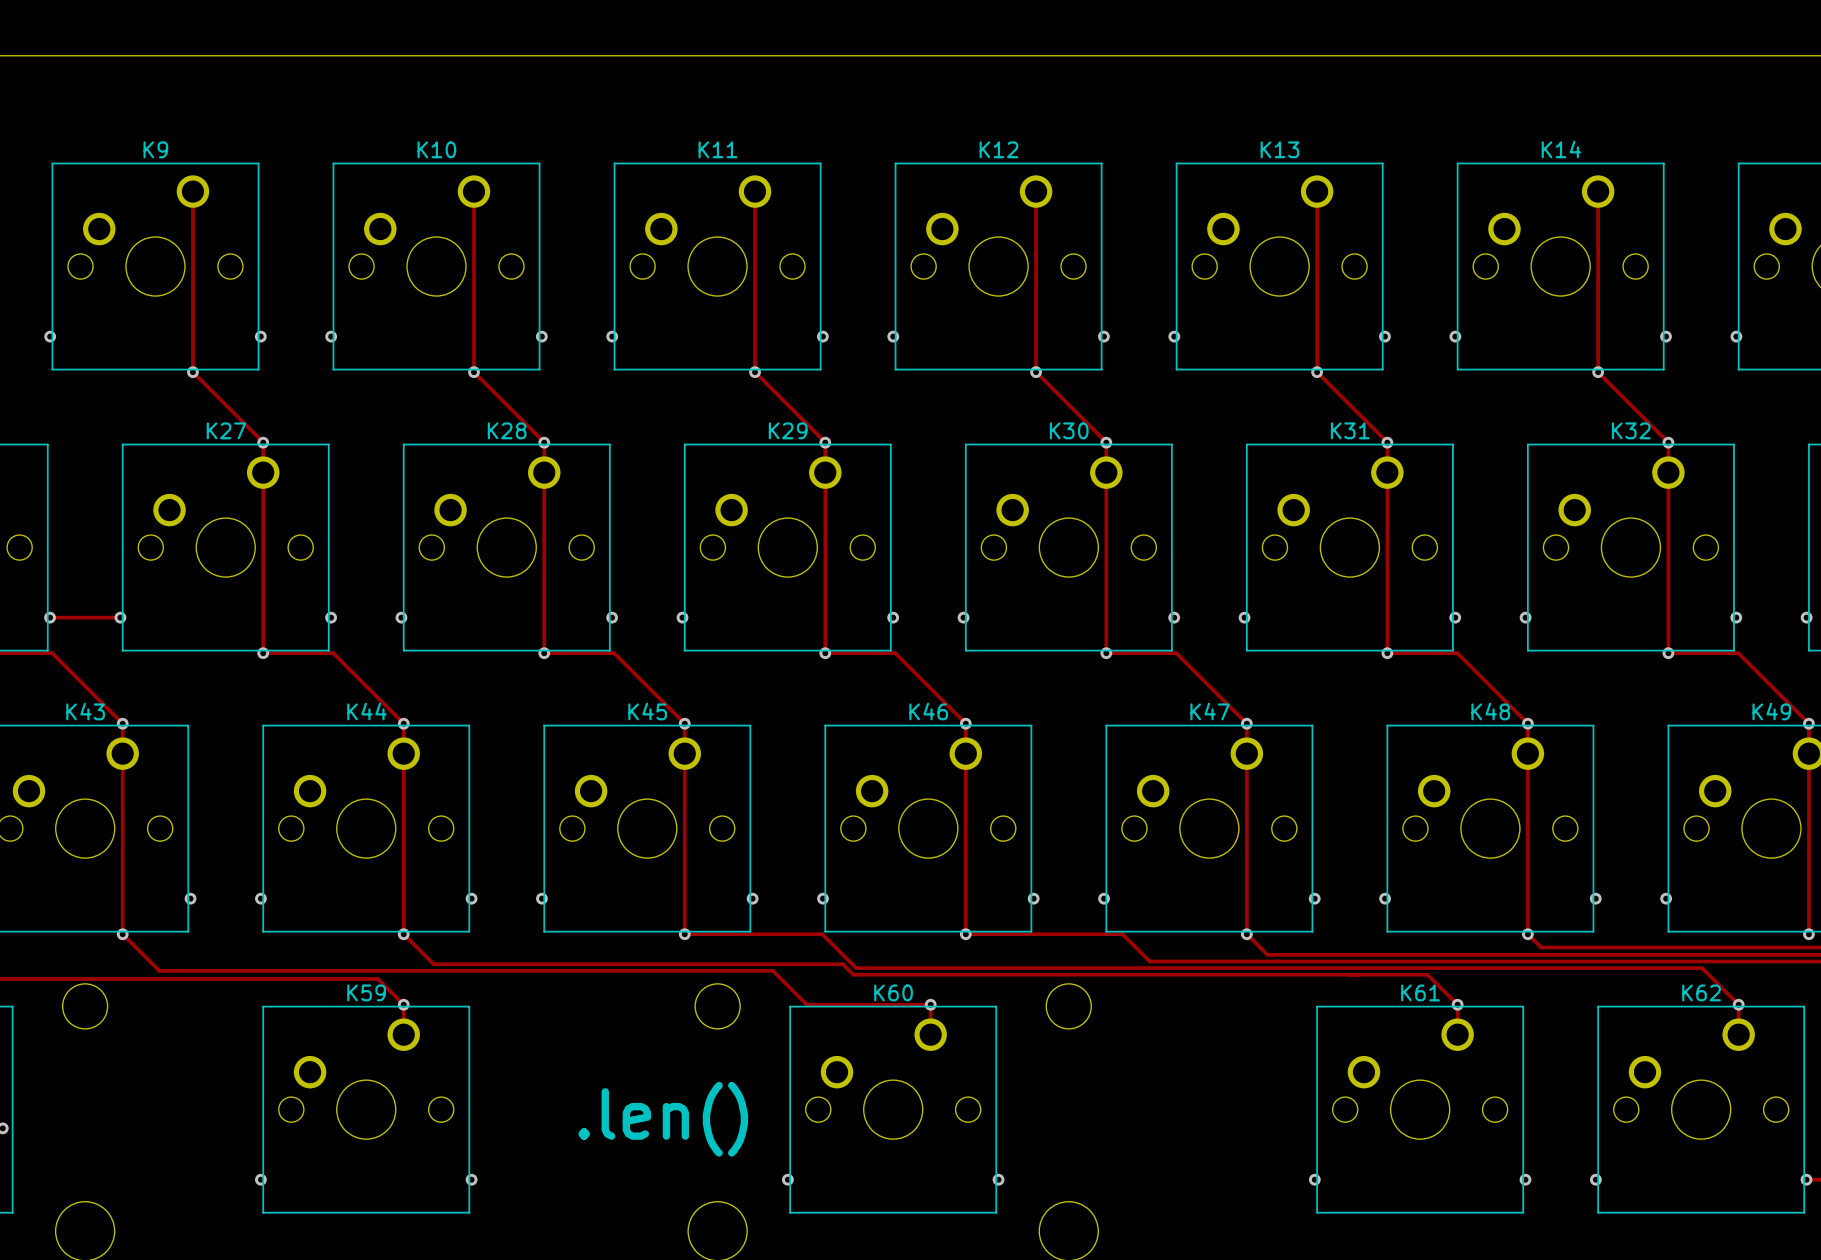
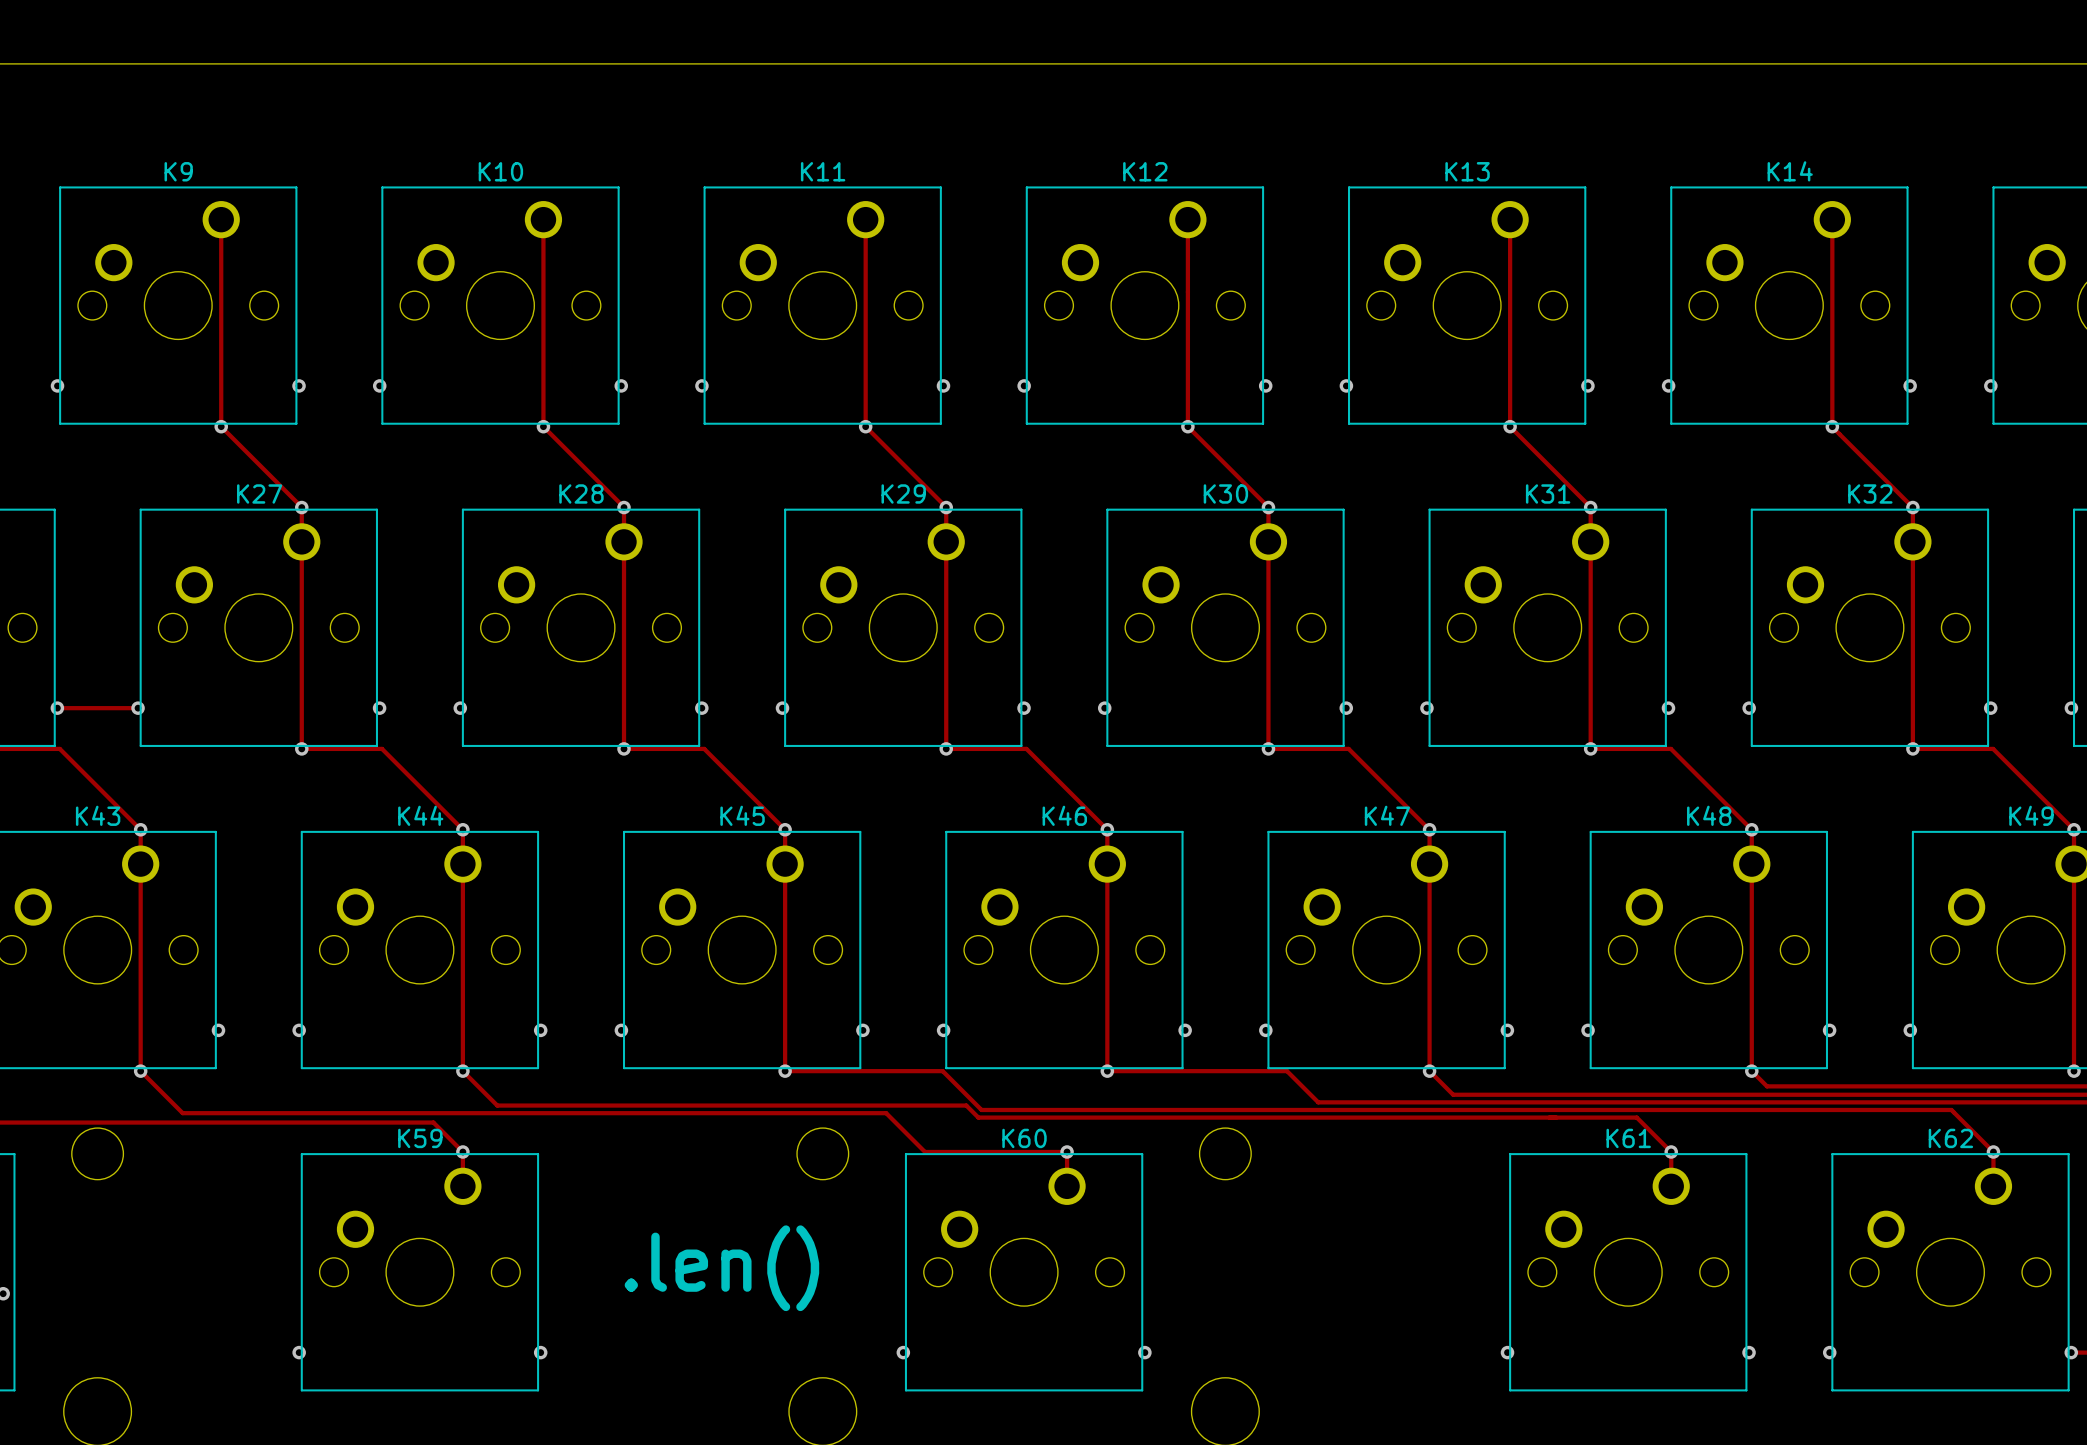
text position: .len() (663, 1119) -> .len() (721, 1268)

